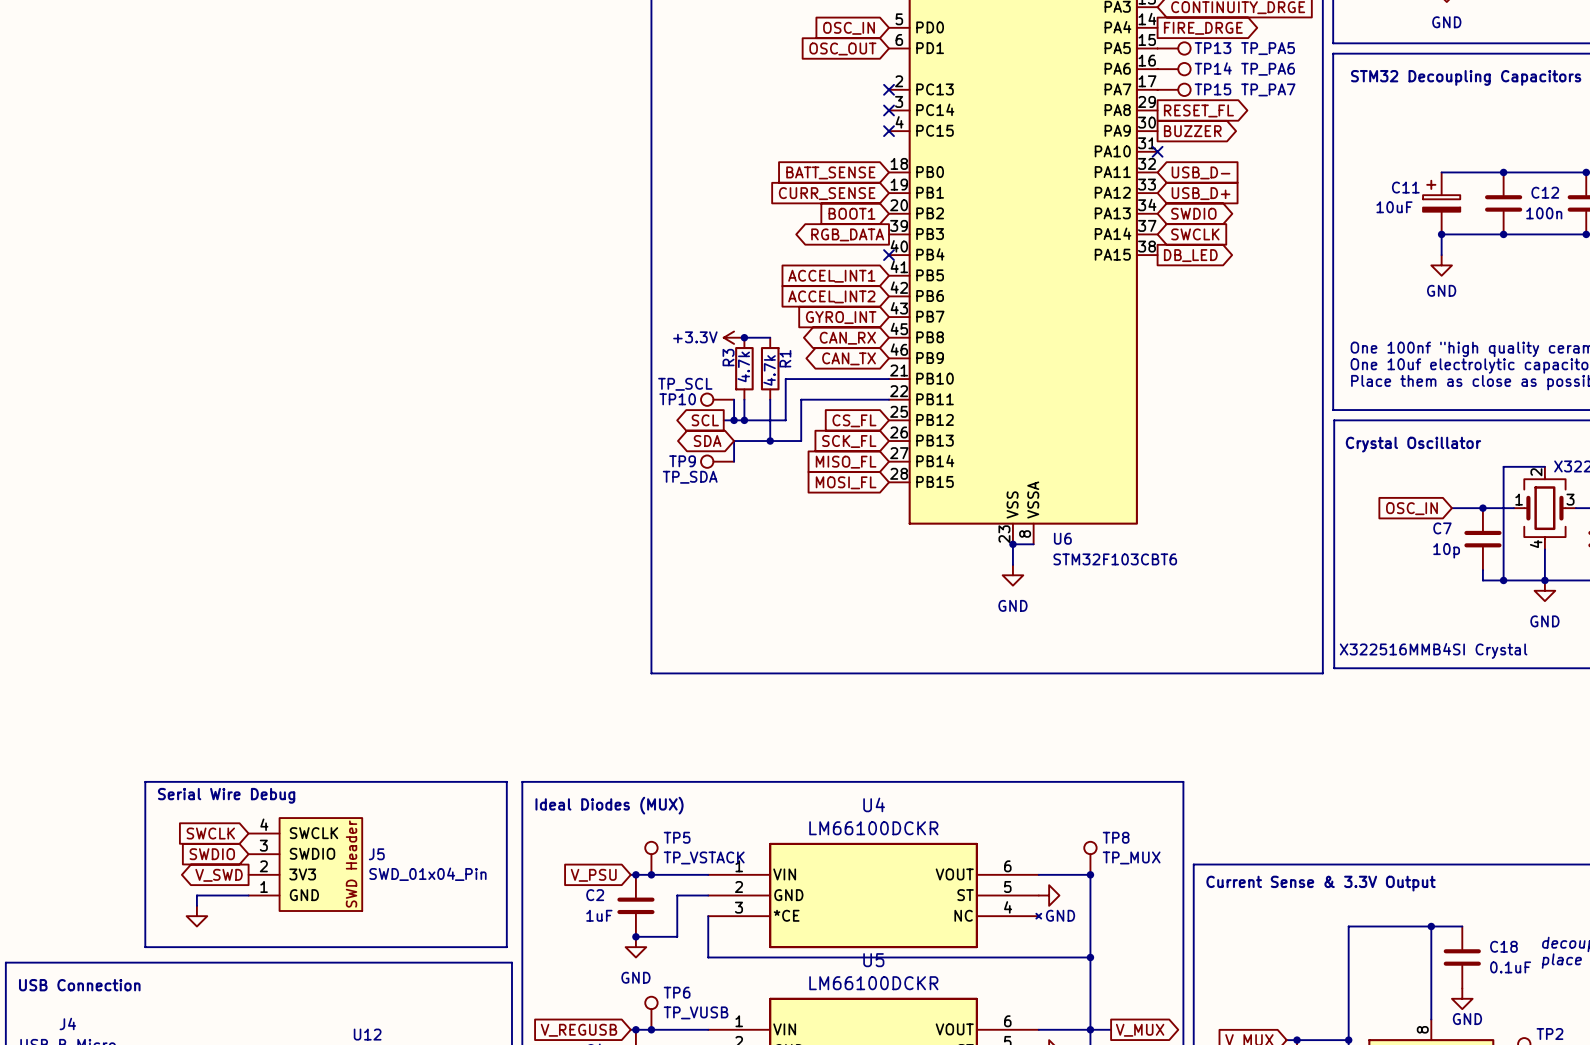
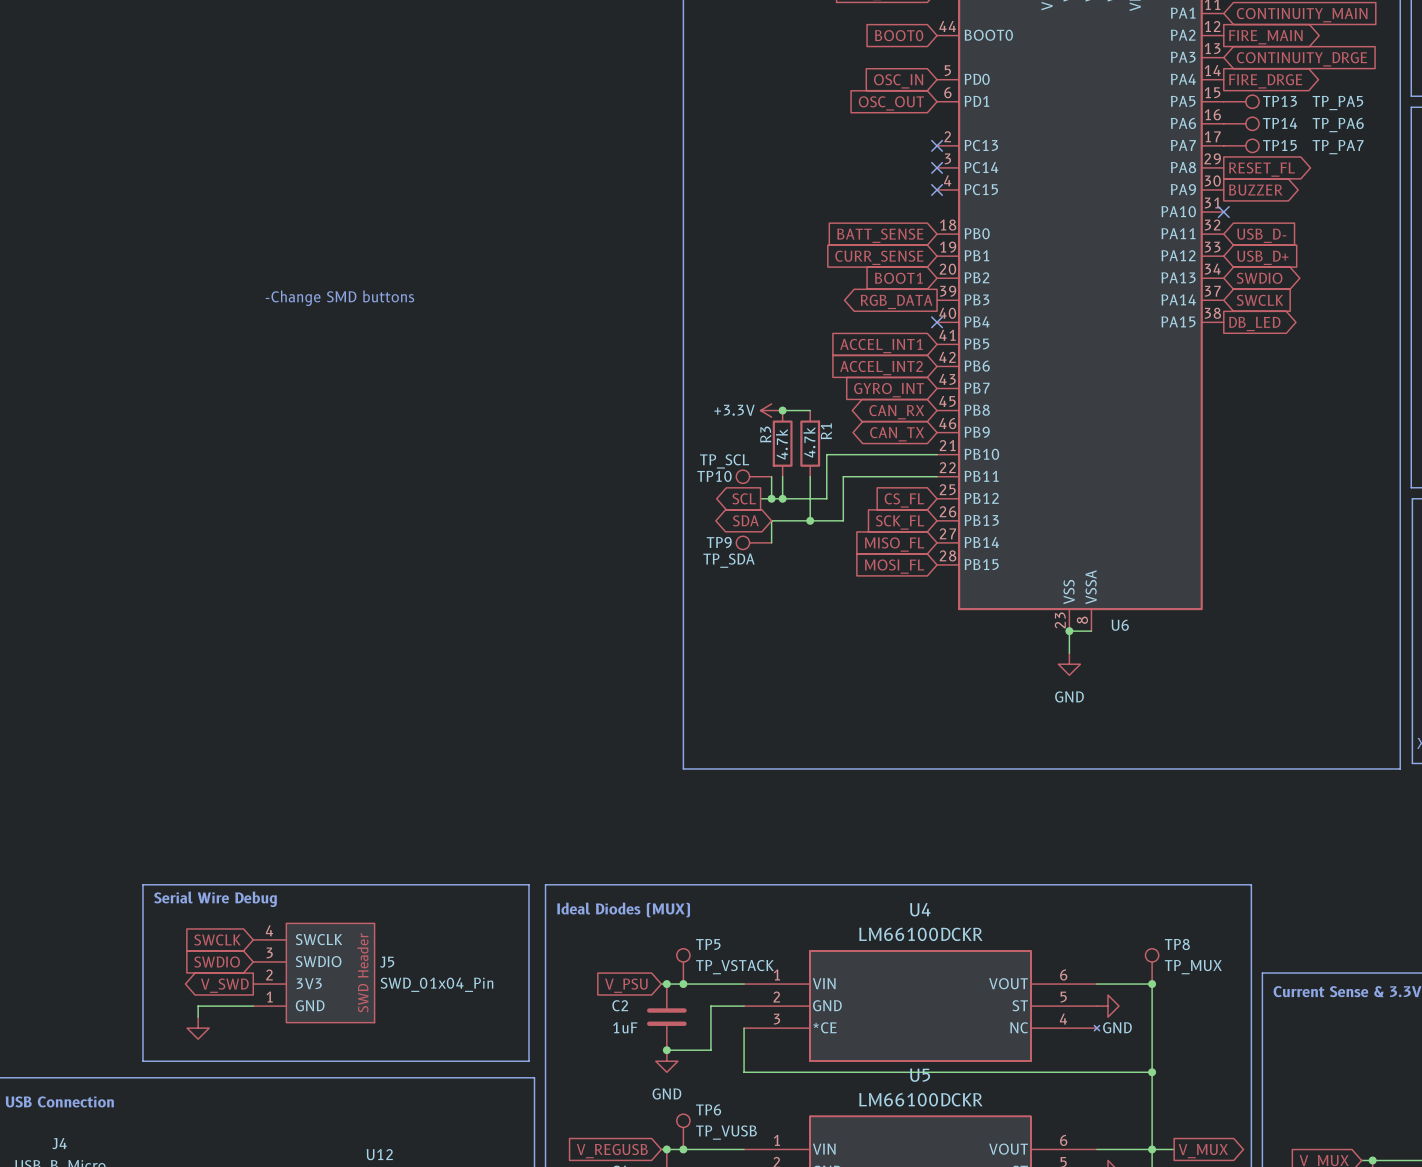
text: none -> -Change SMD buttons (339, 298)
U6 value: STM32F103CBT6 (1115, 559) -> none

